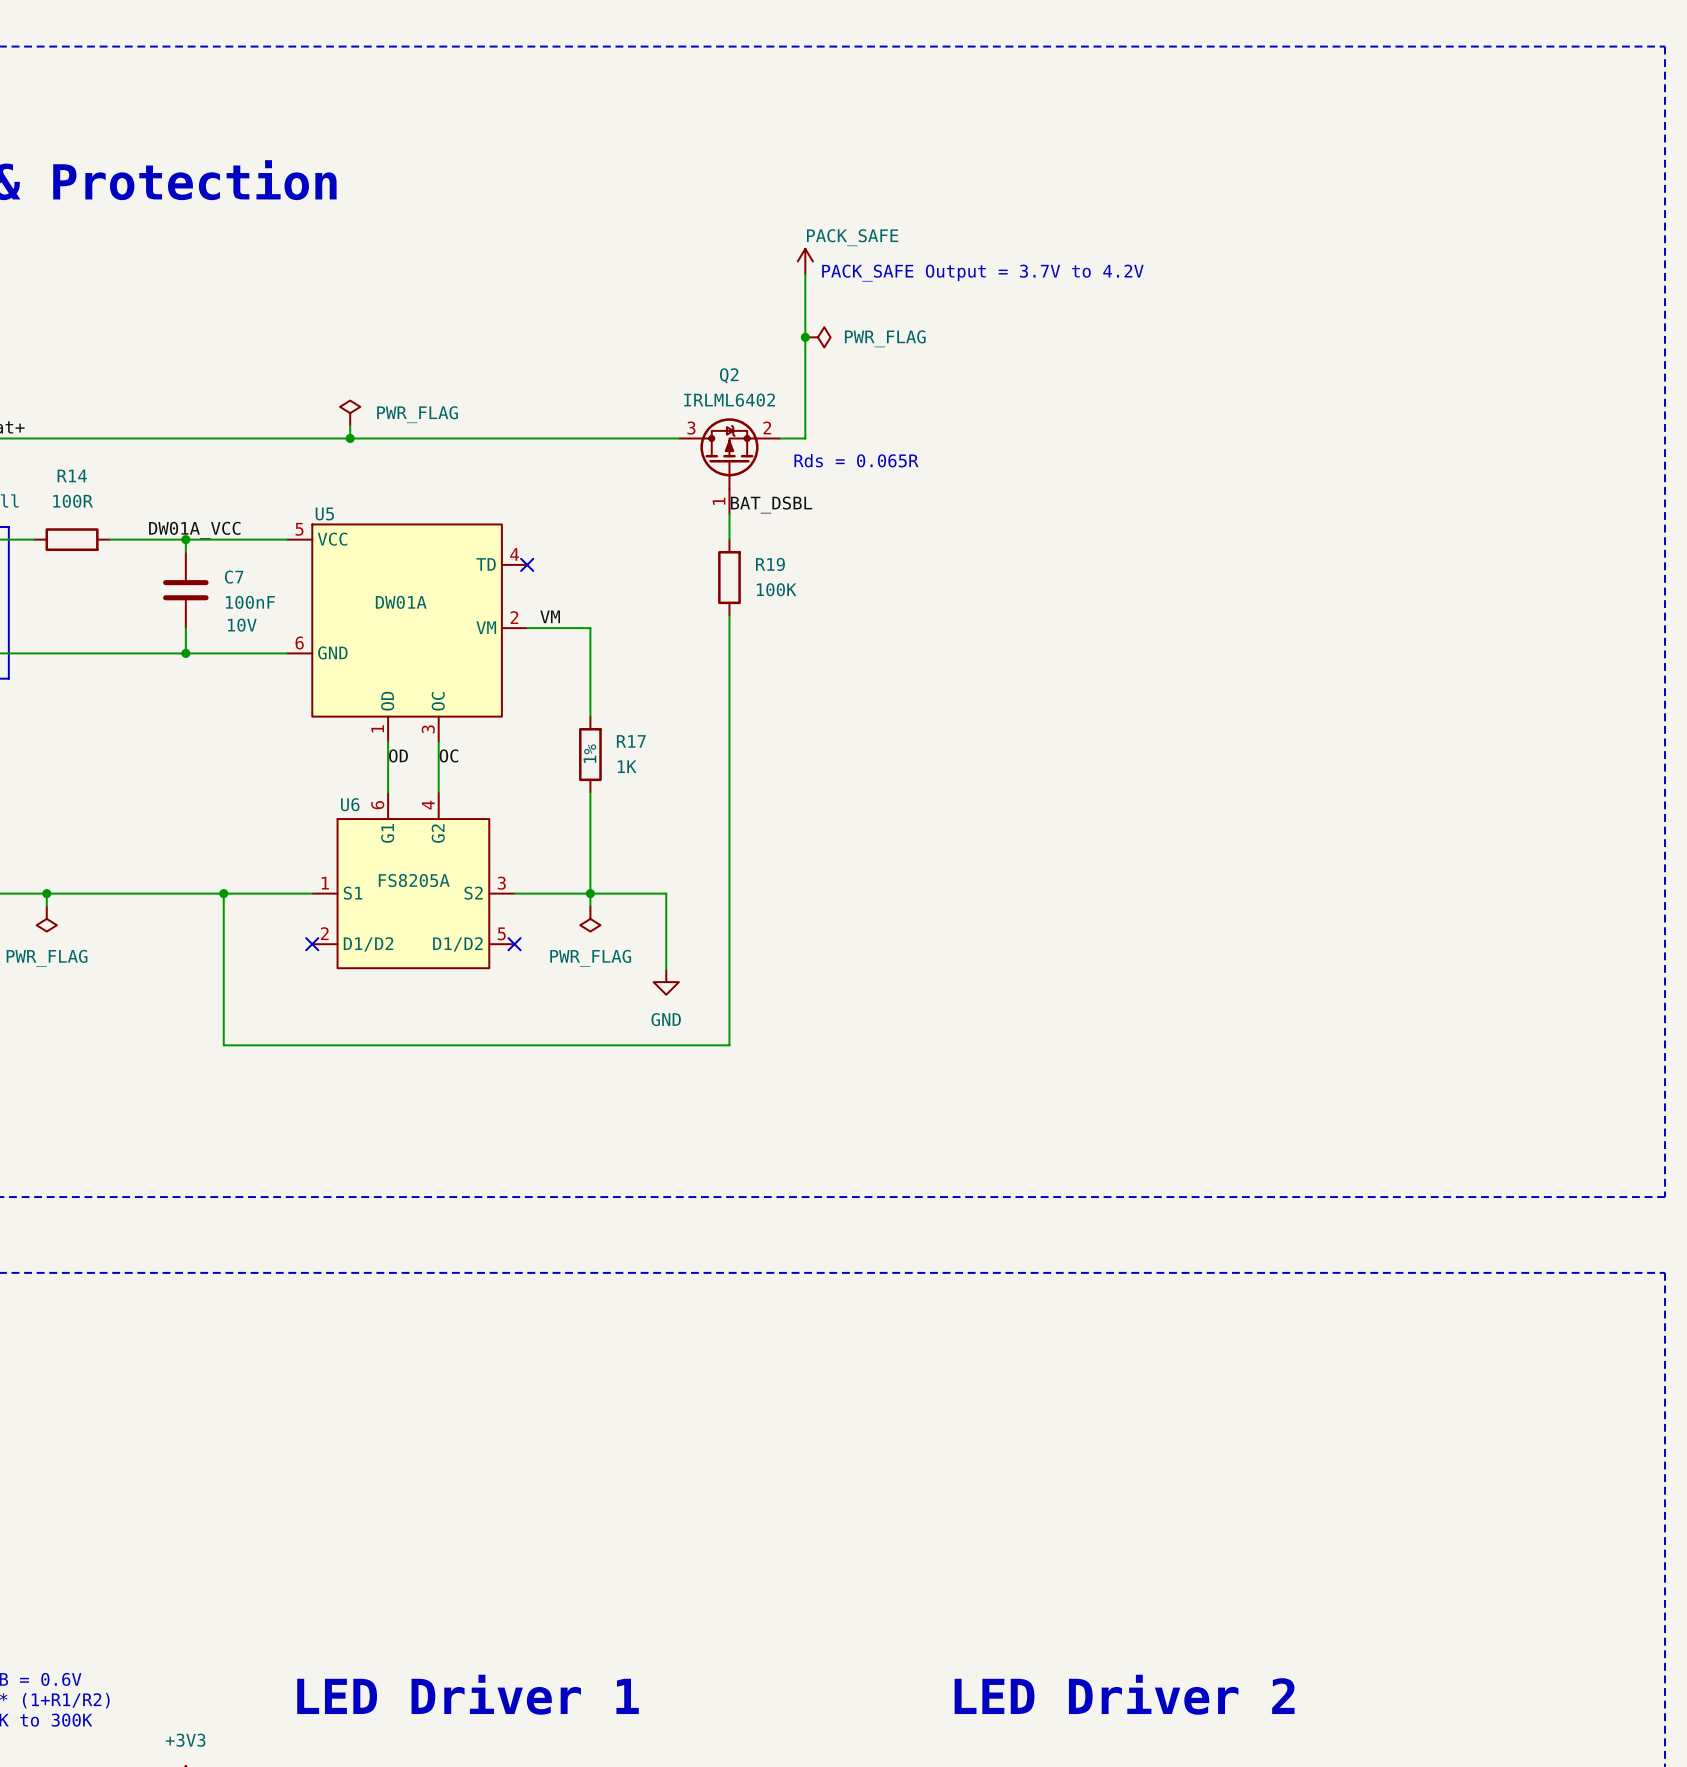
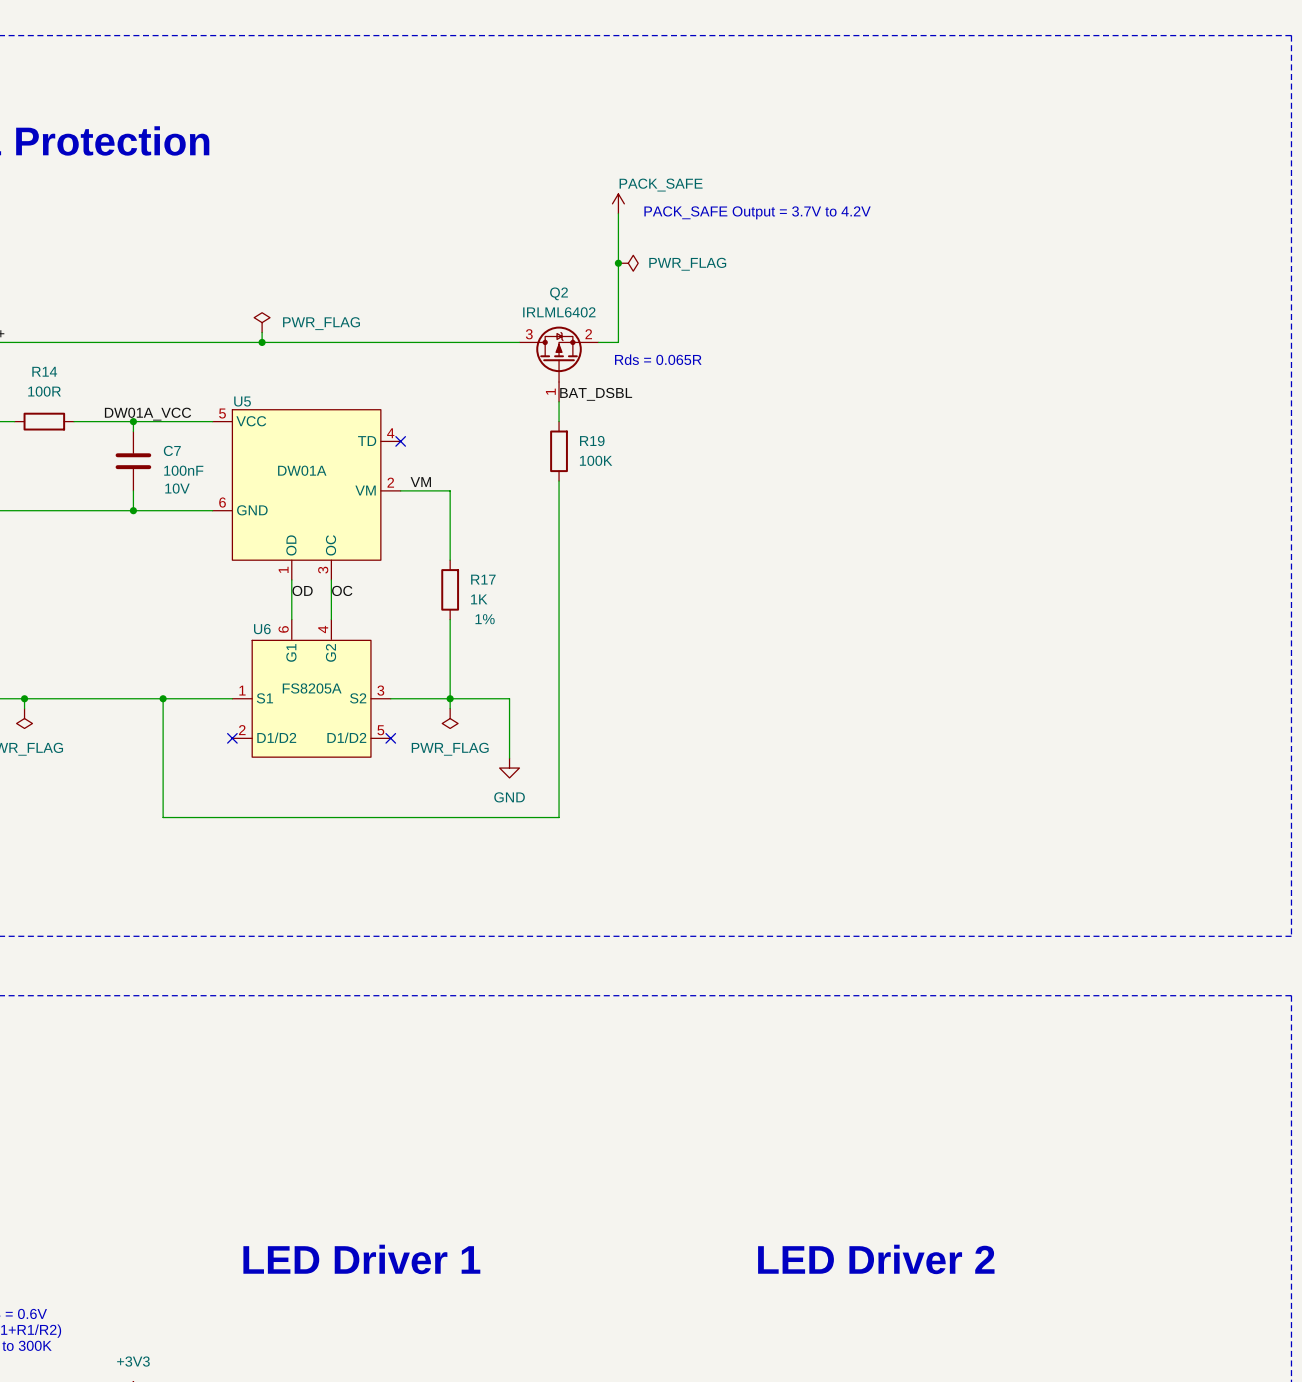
R17 text rotation: 0° (589, 753) -> 90° clockwise (485, 619)
R17 text position: 1% (589, 753) -> 1% (485, 619)
text position: LED Driver 1 (468, 1694) -> LED Driver 1 (361, 1259)
text position: LED Driver 2 (1124, 1694) -> LED Driver 2 (876, 1259)

